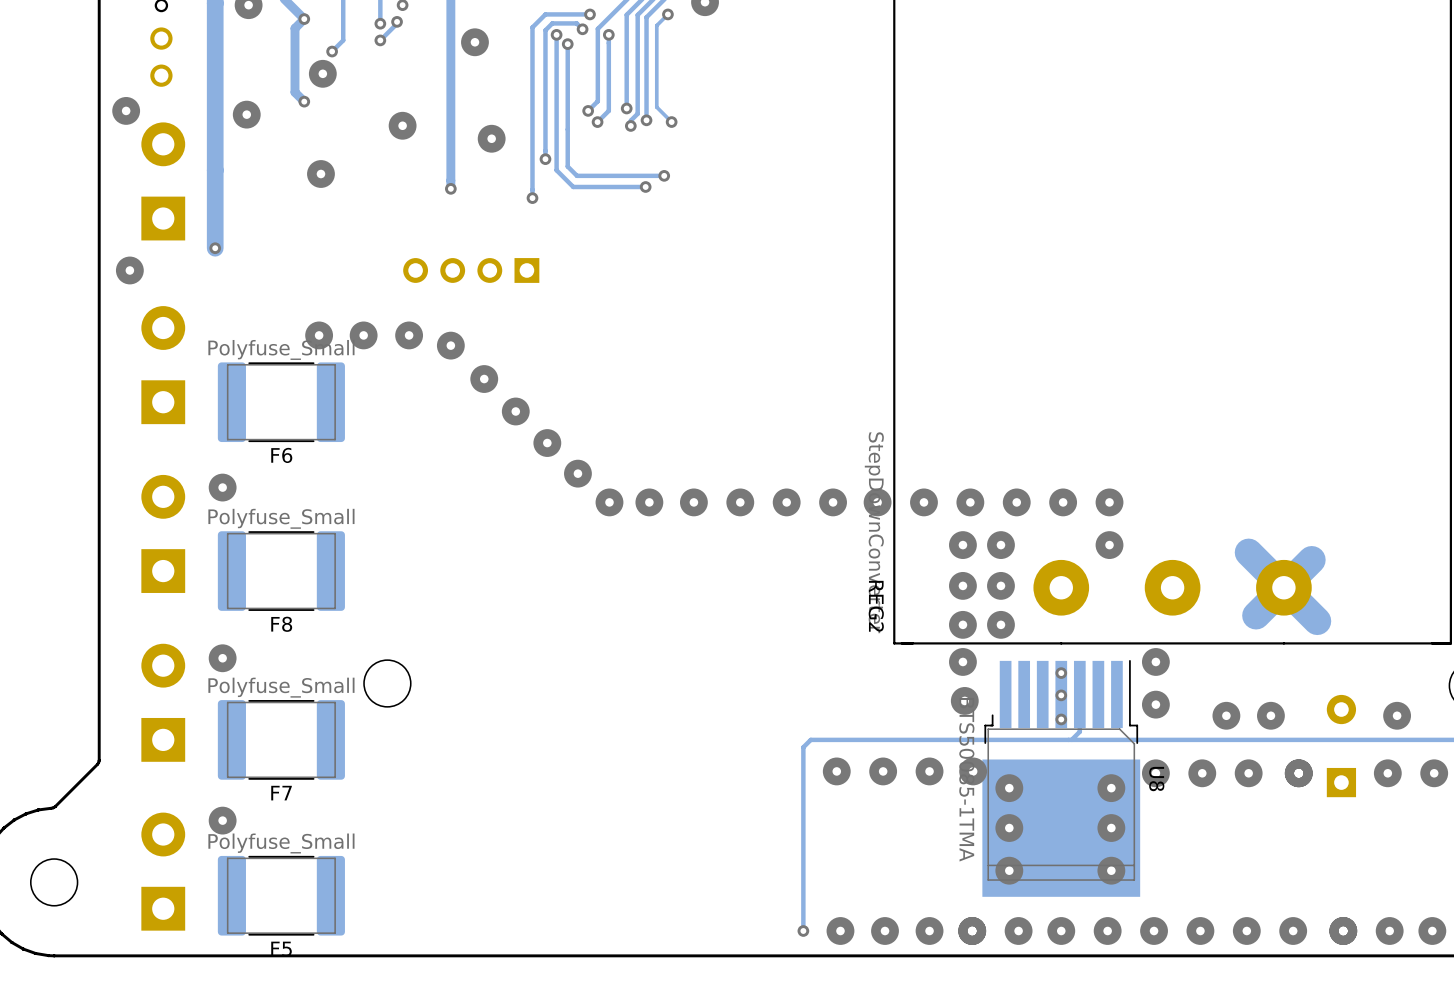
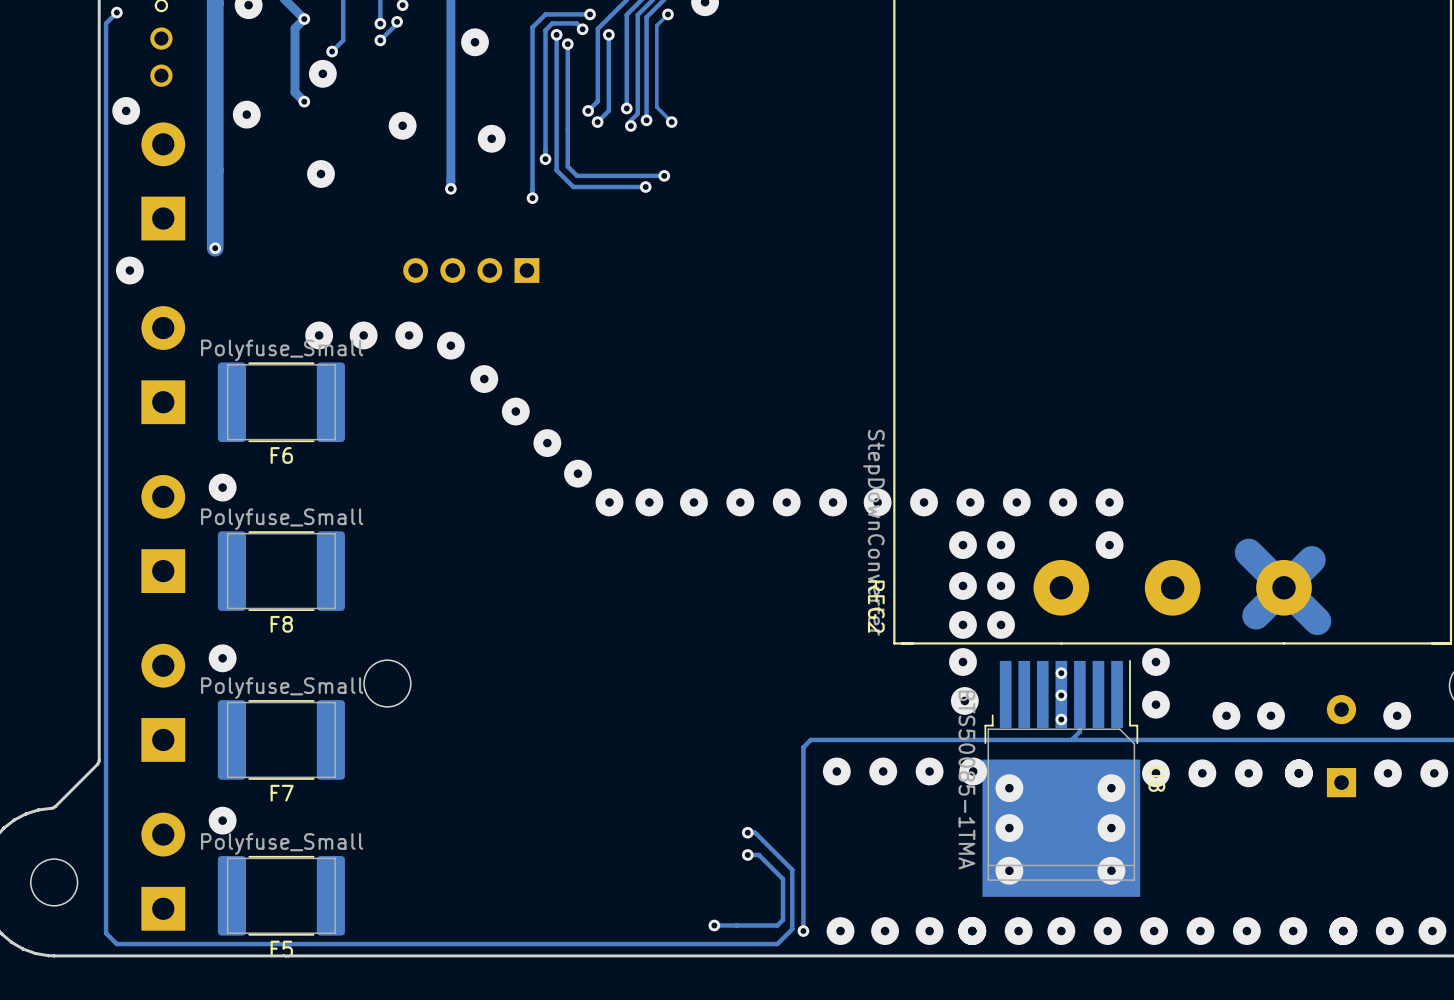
track: none -> (116, 12) (106, 23) (106, 933) (116, 944) (777, 944) (792, 929) (792, 869) (755, 832) (747, 832)
via: none -> (116, 12)
via: none -> (747, 832)
track: none -> (747, 854) (758, 854) (783, 879) (783, 919) (777, 925) (714, 925)
via: none -> (747, 854)
via: none -> (714, 925)

